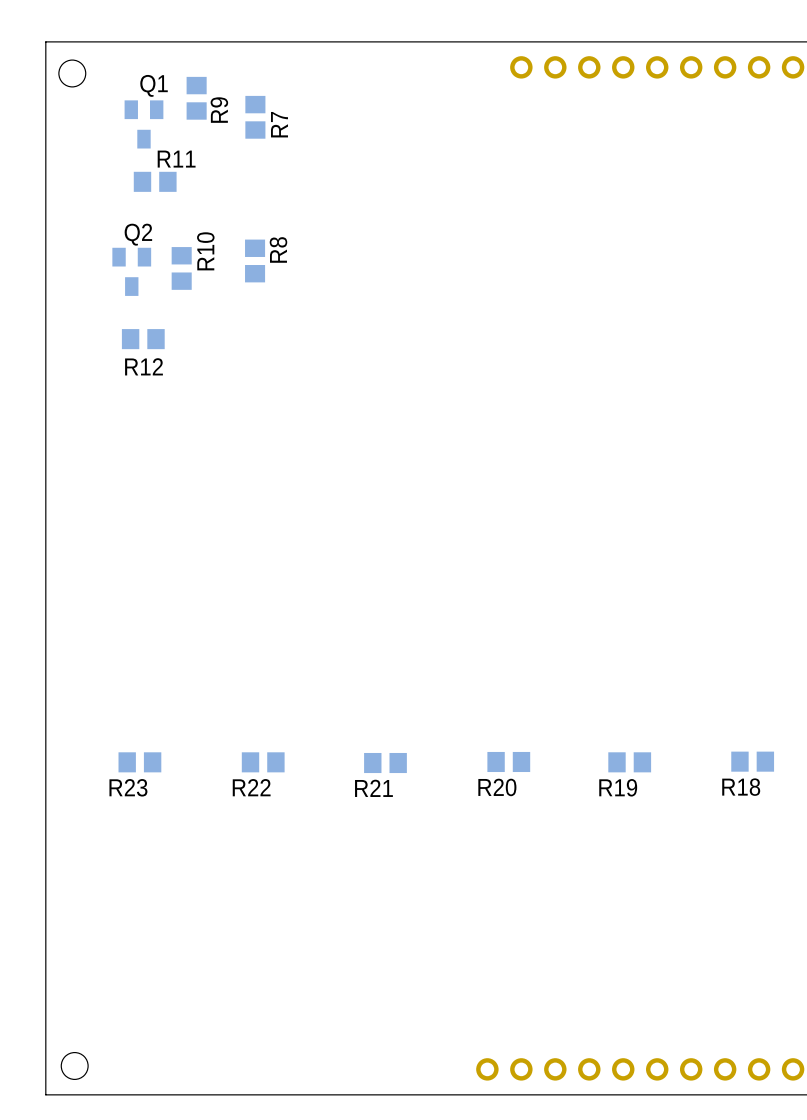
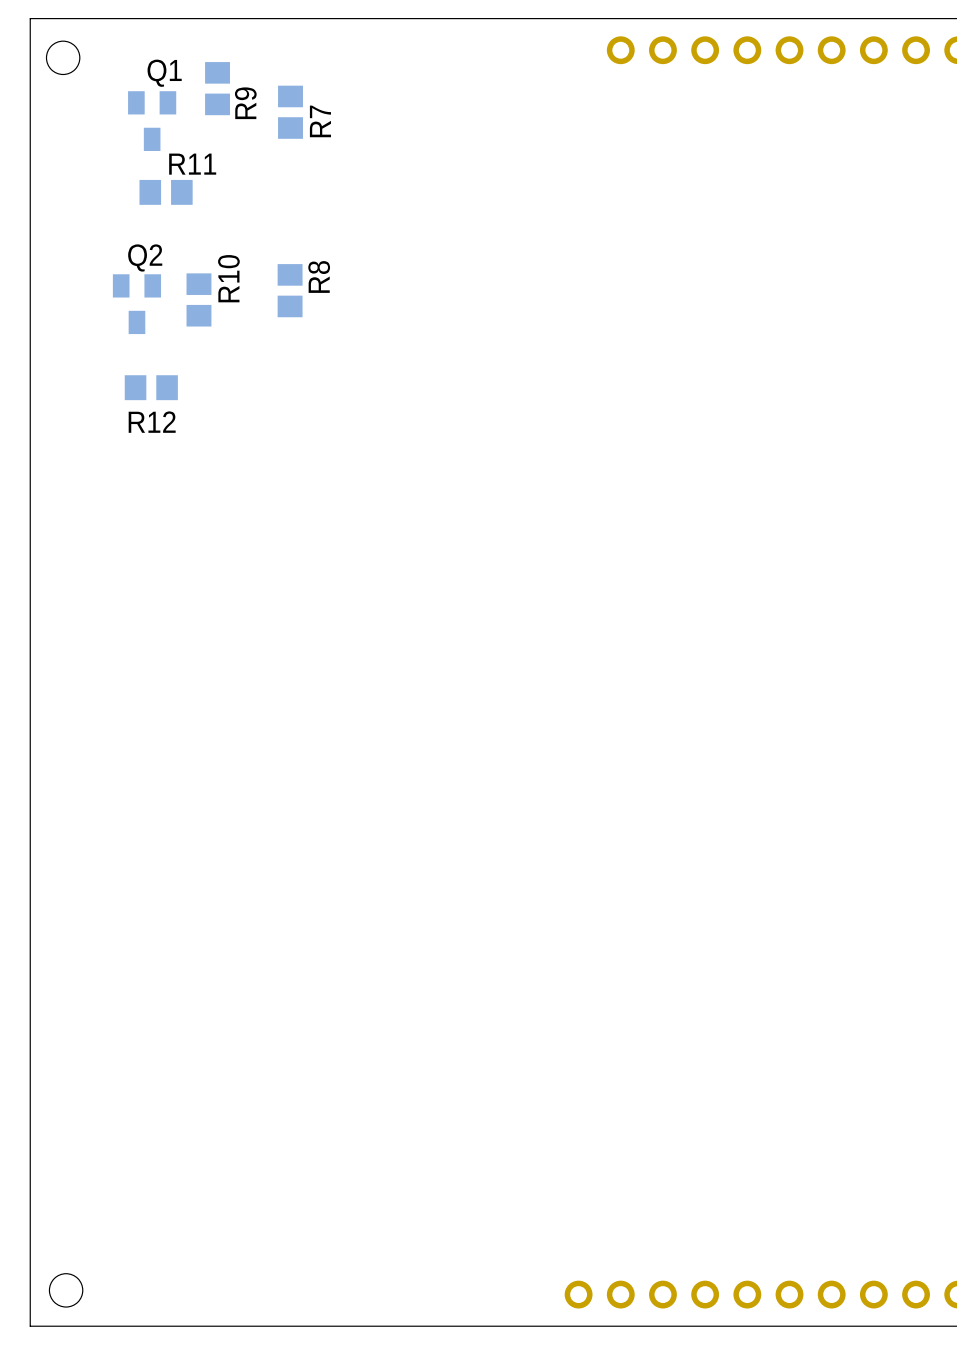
R20: (508, 761) -> none
R18: (752, 761) -> none
R23: (139, 762) -> none
R22: (263, 762) -> none
R19: (629, 762) -> none
R21: (385, 763) -> none

